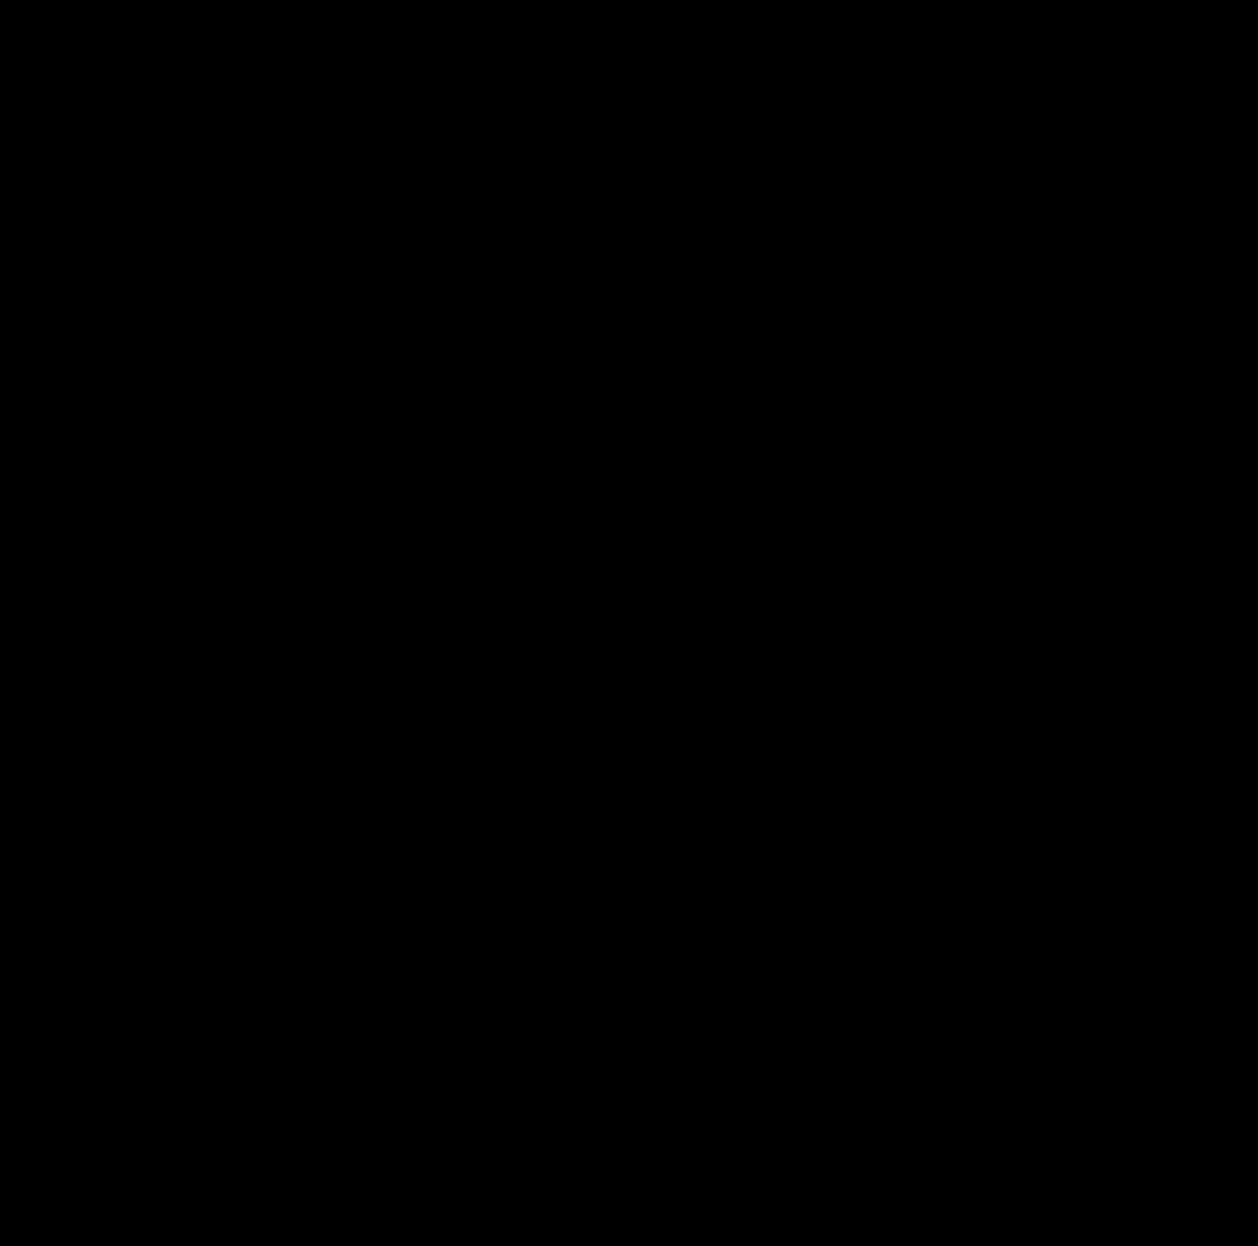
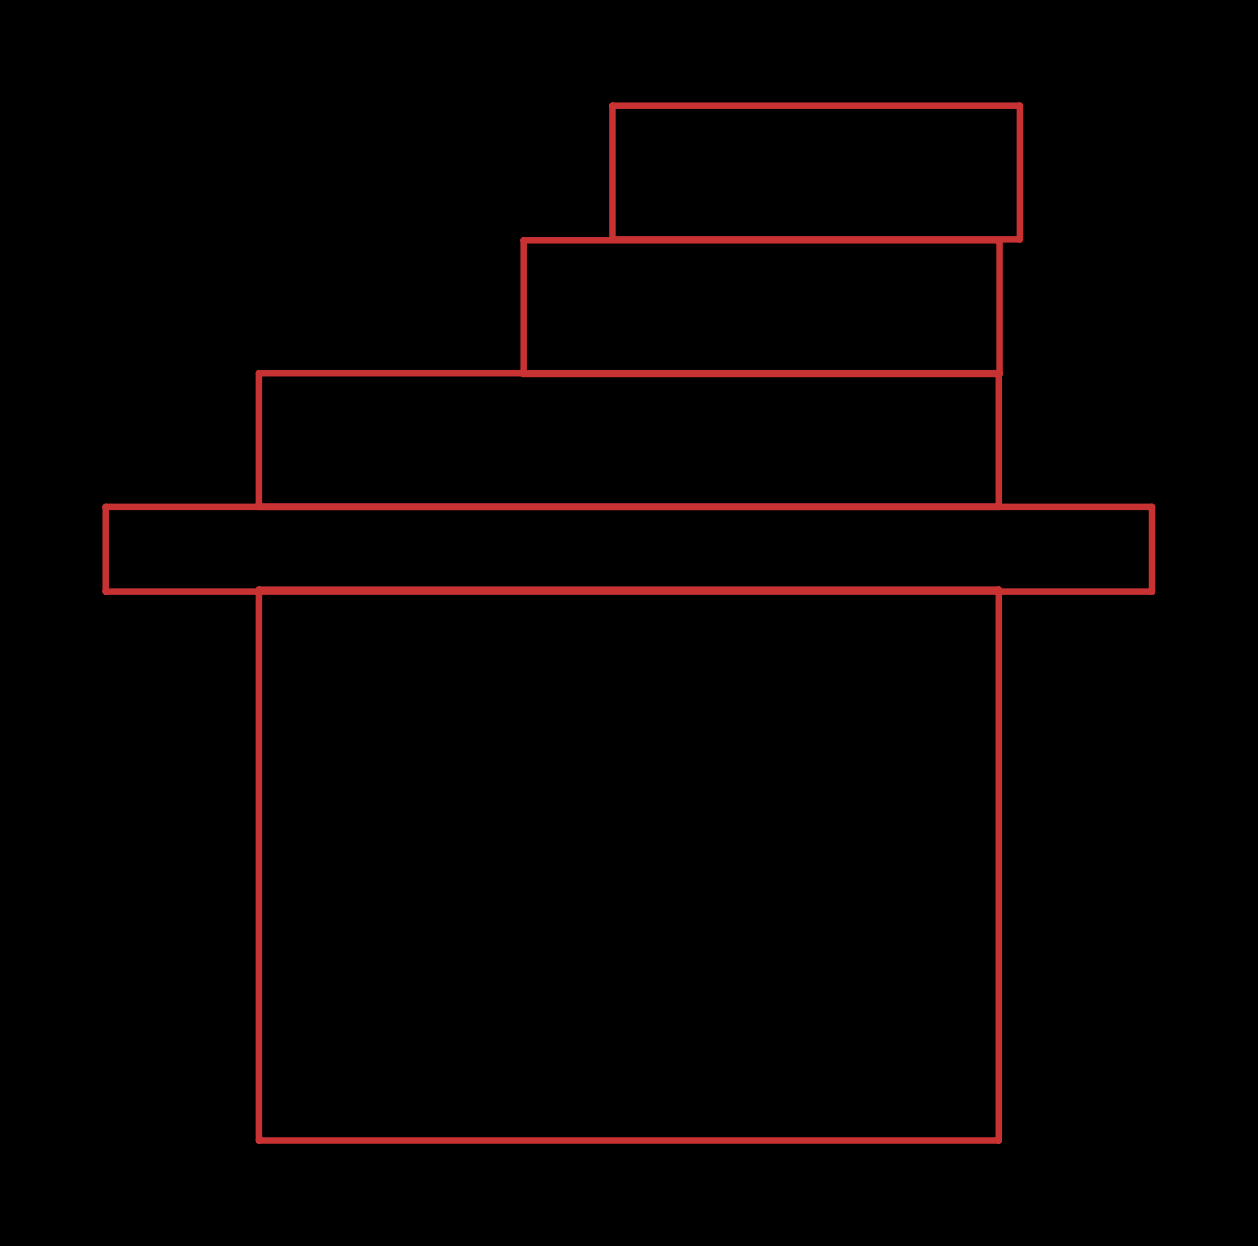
top track: none -> (612, 105) (1019, 105) (1019, 239) (612, 239) (612, 105)
top track: none -> (523, 240) (999, 240) (999, 373) (523, 373) (523, 240)
top track: none -> (105, 506) (1152, 506) (1152, 591) (105, 591) (105, 506)
top track: none -> (258, 506) (258, 373) (998, 373) (998, 506)
top track: none -> (258, 589) (258, 1140) (998, 1140) (998, 589) (258, 589)

